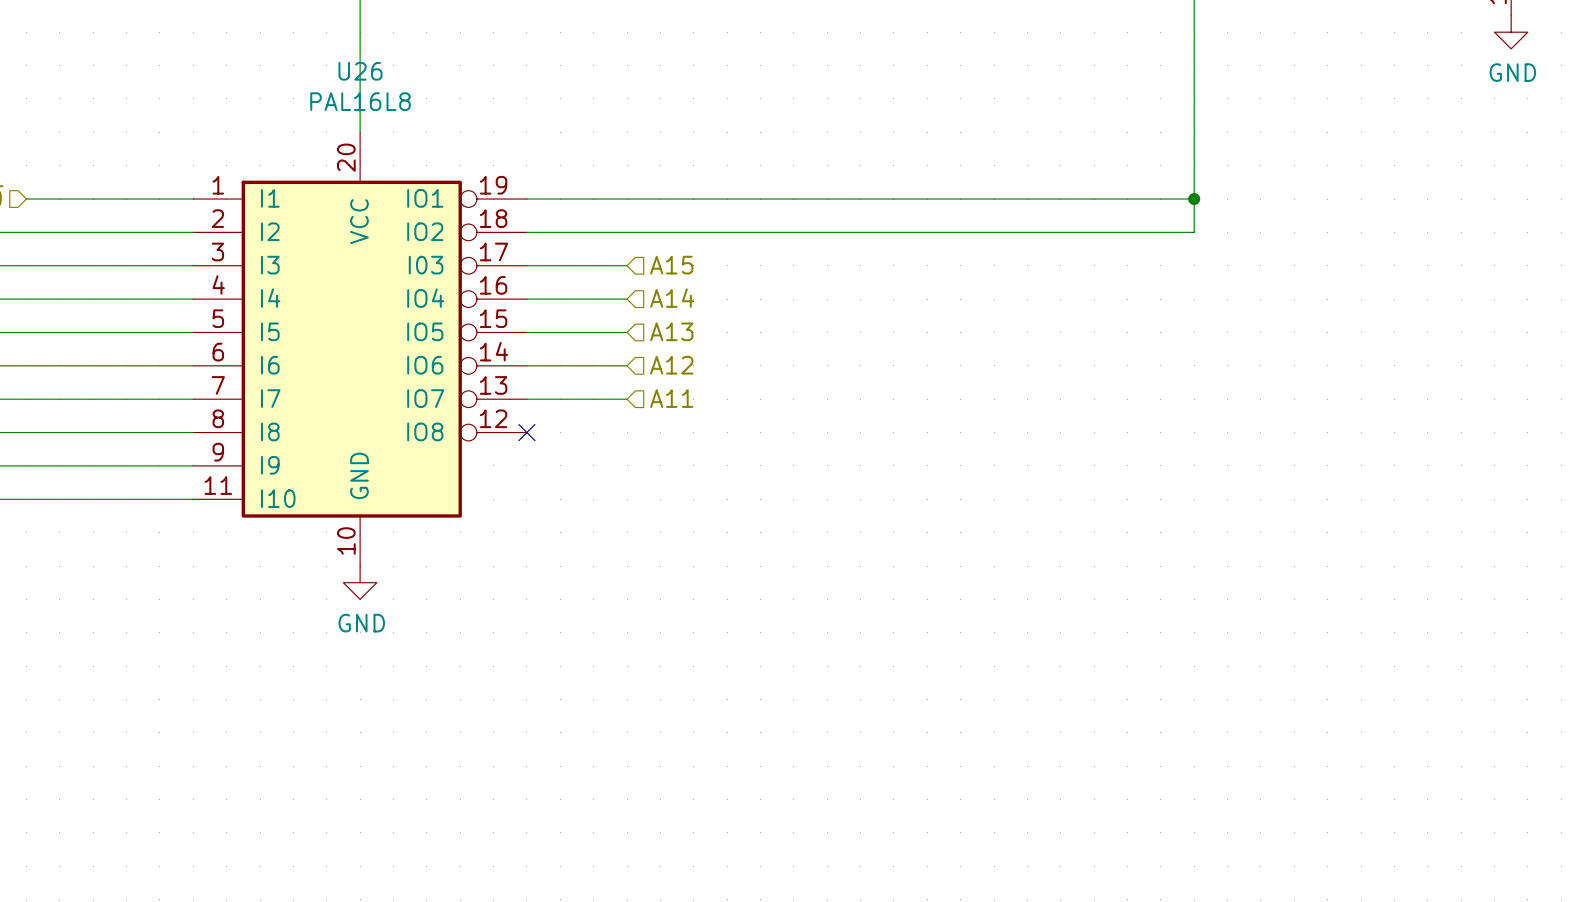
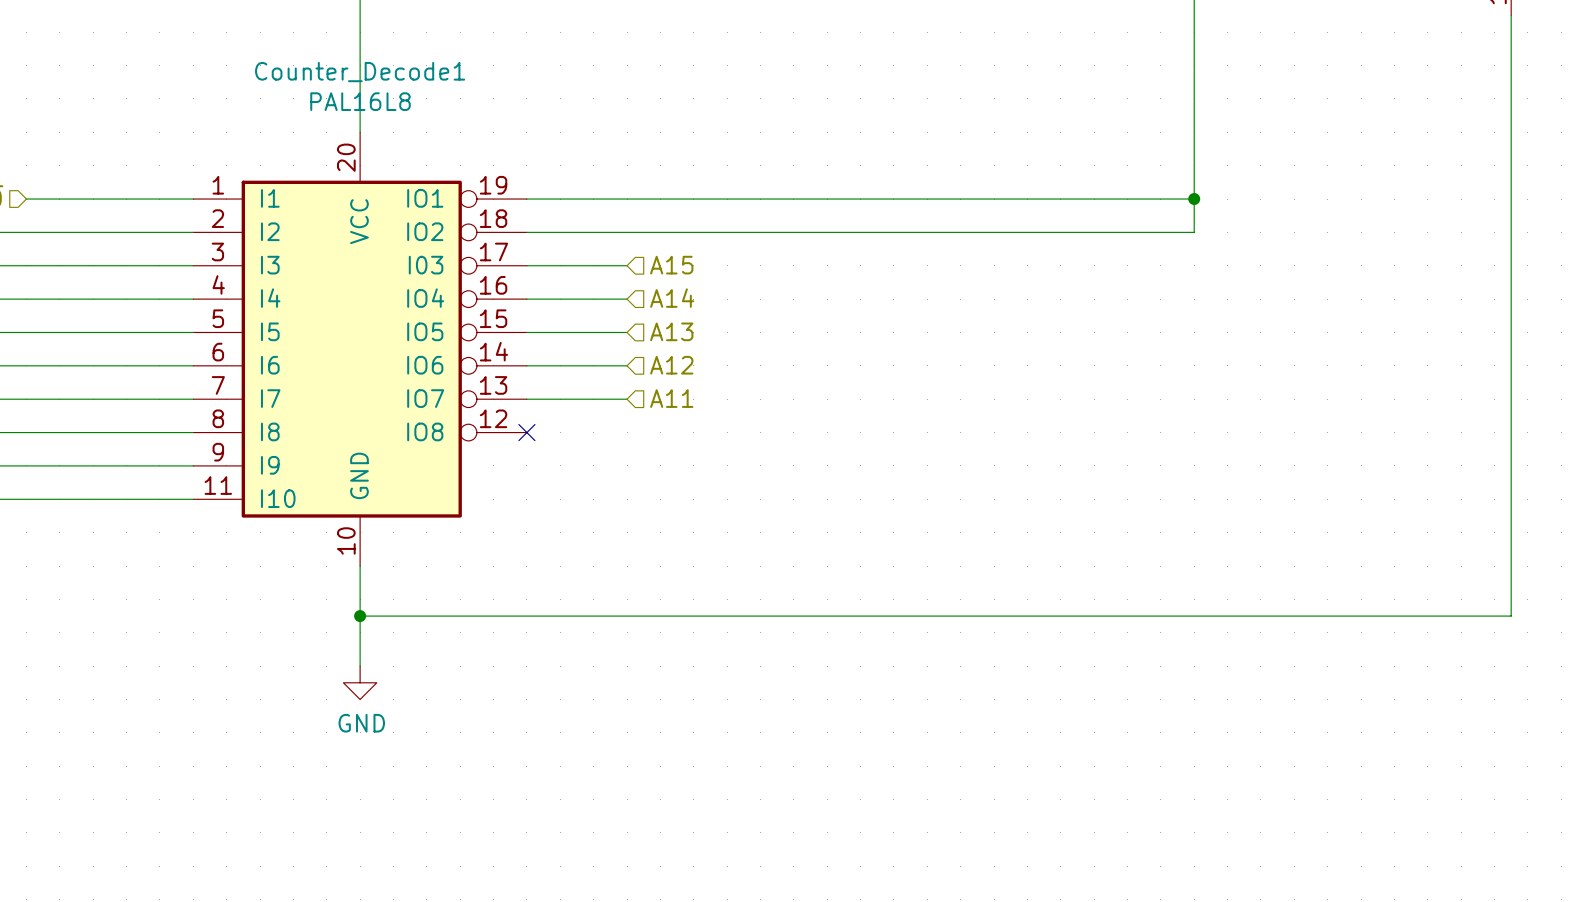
wire: none -> (1511, 15) (1511, 616) (360, 616)
power symbol: GND (1511, 32) -> none
U26 name: U26 (360, 71) -> Counter_Decode1 (360, 72)
wire: none -> (360, 566) (360, 666)
power symbol position: GND (360, 582) -> GND (360, 682)
junction: none -> (360, 616)

